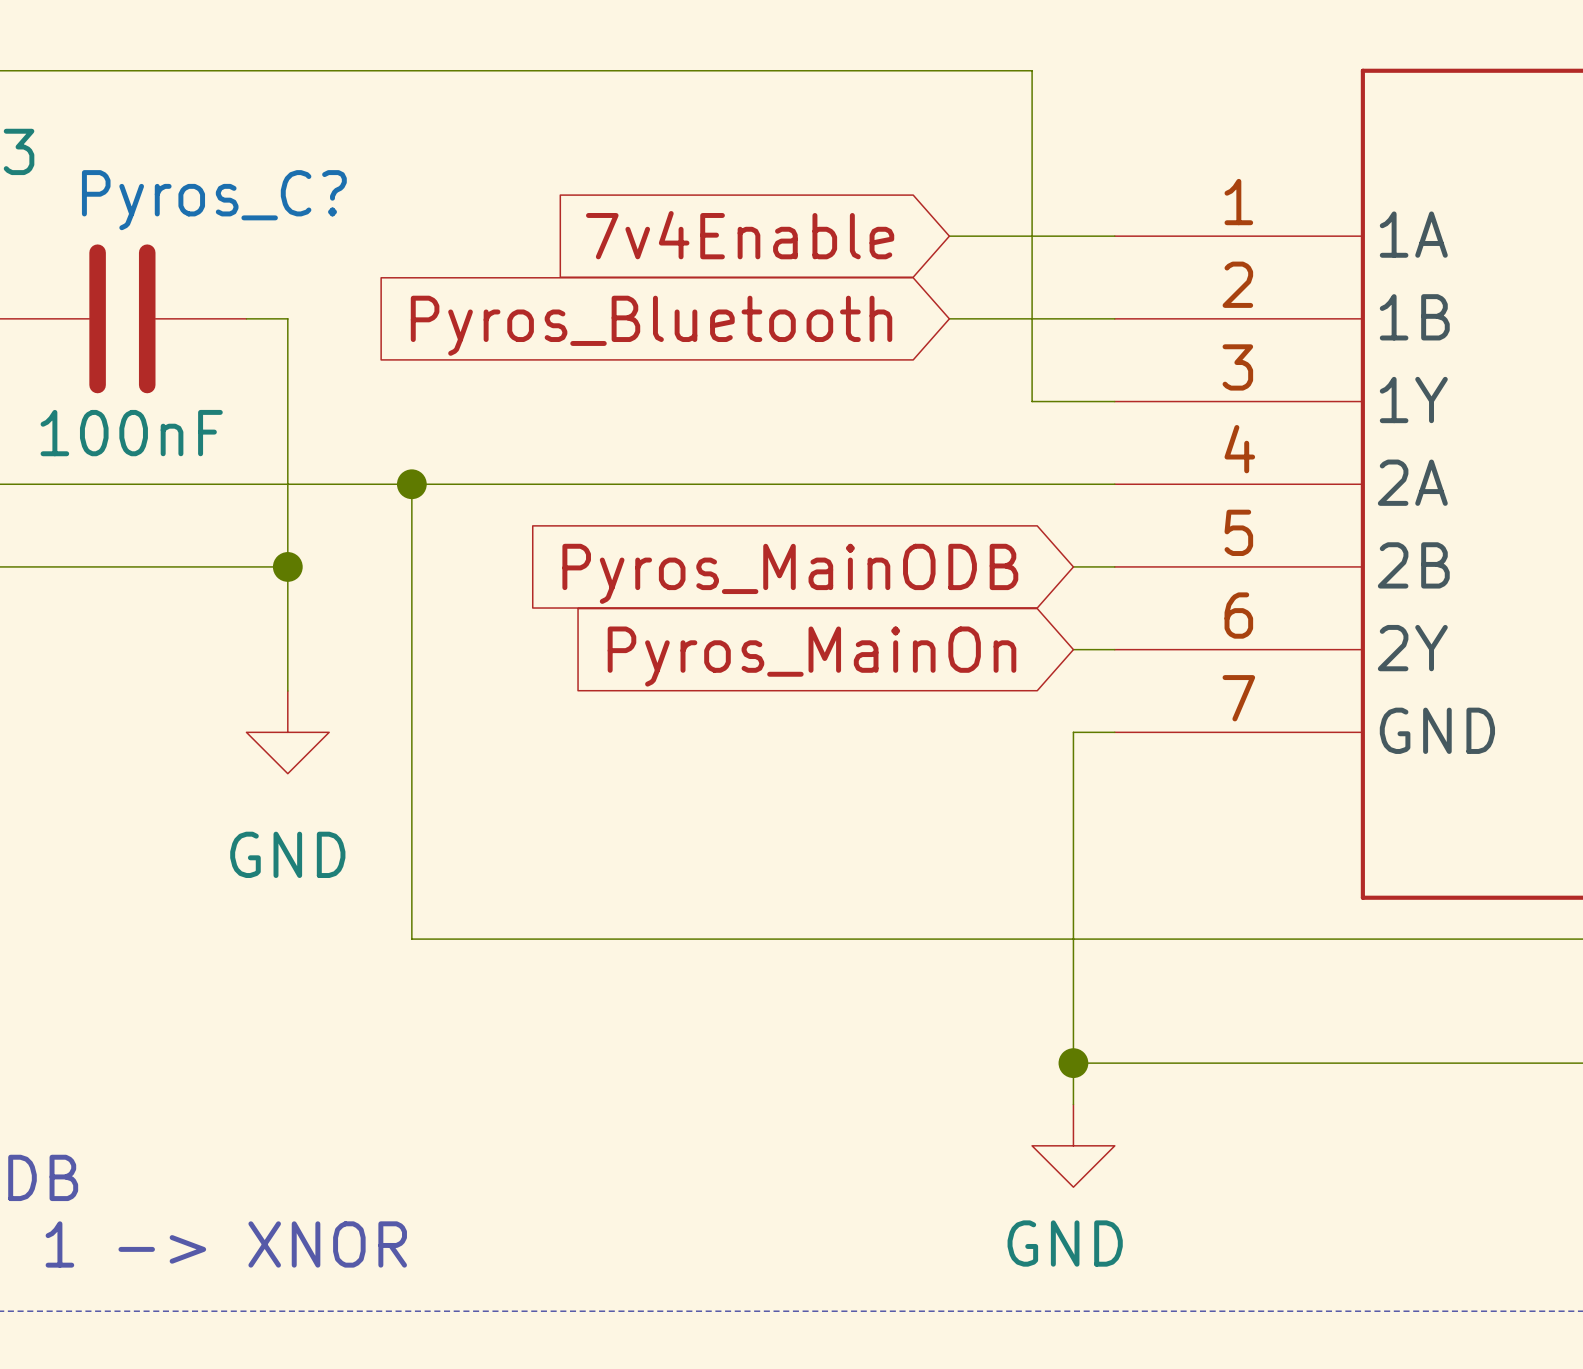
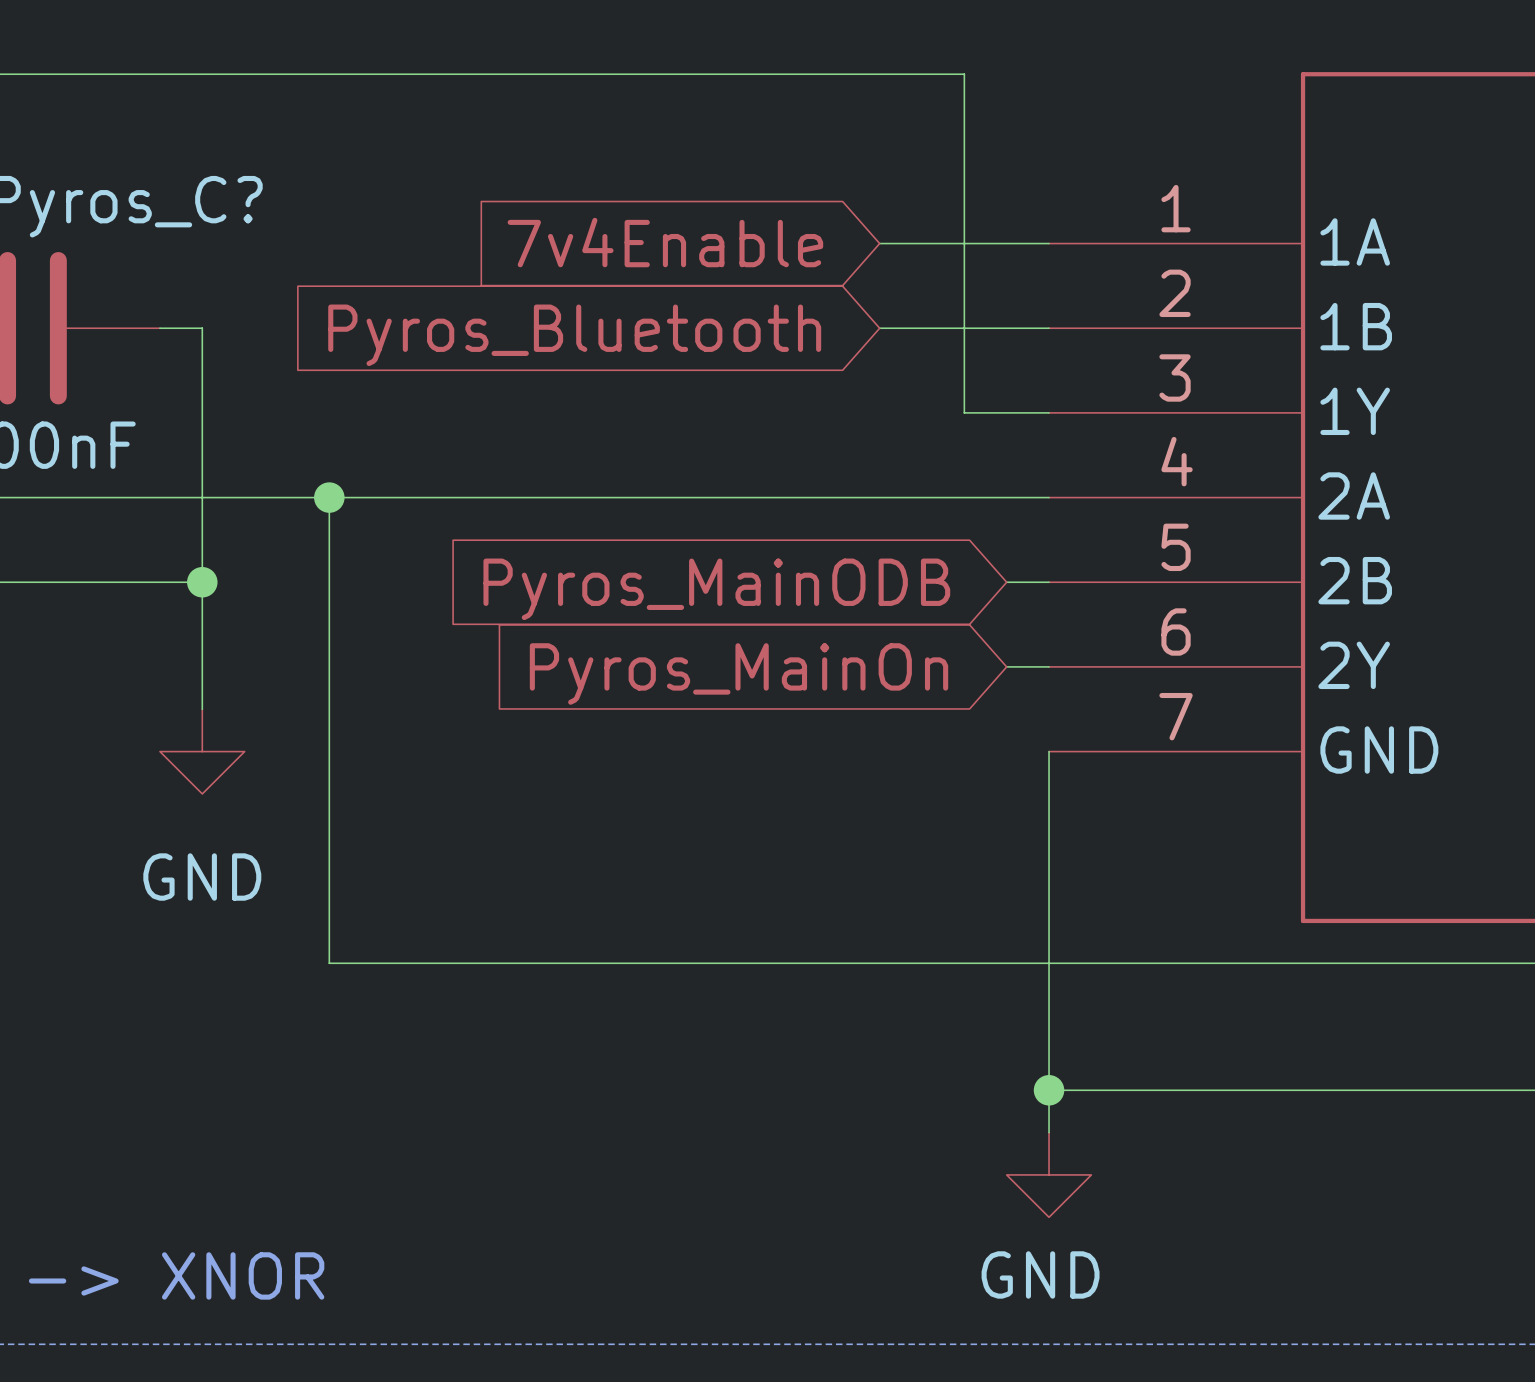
wire: (1114, 732) (1073, 732) (1073, 1104) -> (1049, 751) (1049, 1132)
wire: (1073, 1063) (1114, 1063) -> none
junction position: (1073, 1063) -> (1049, 1090)
power symbol position: GND (1073, 1145) -> GND (1049, 1174)

